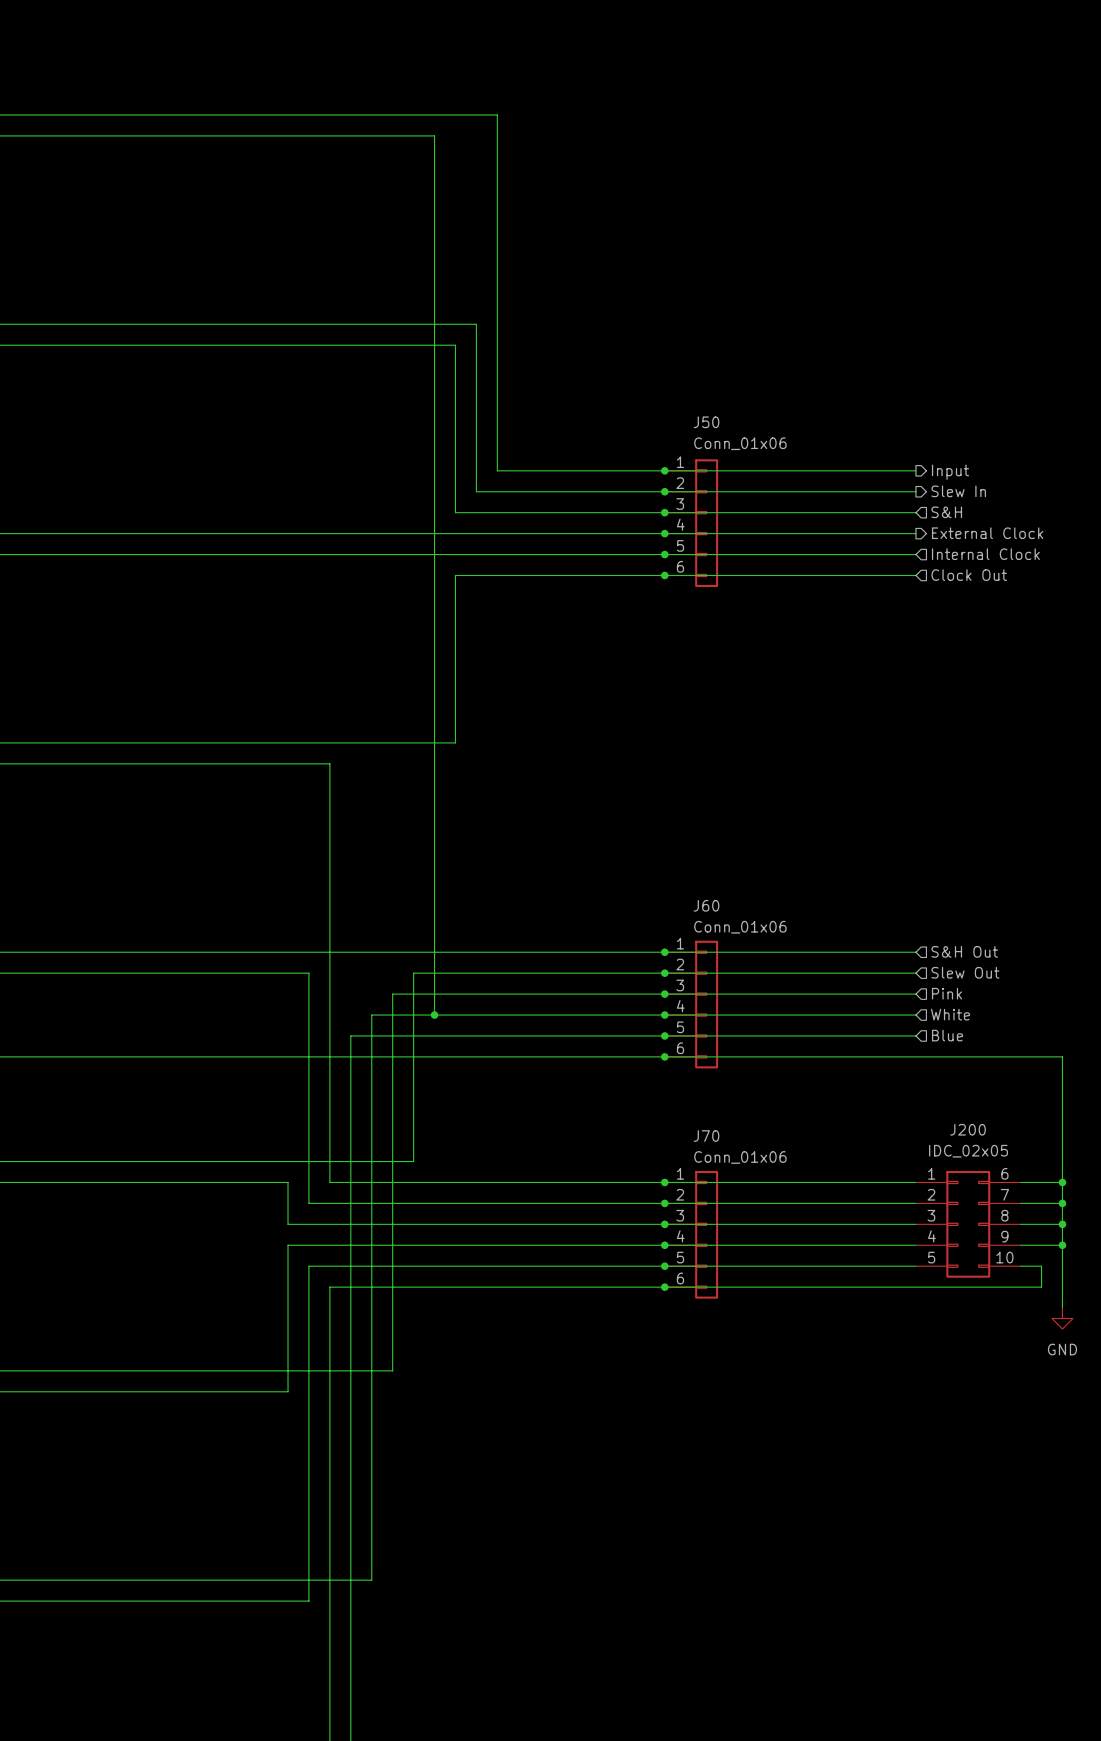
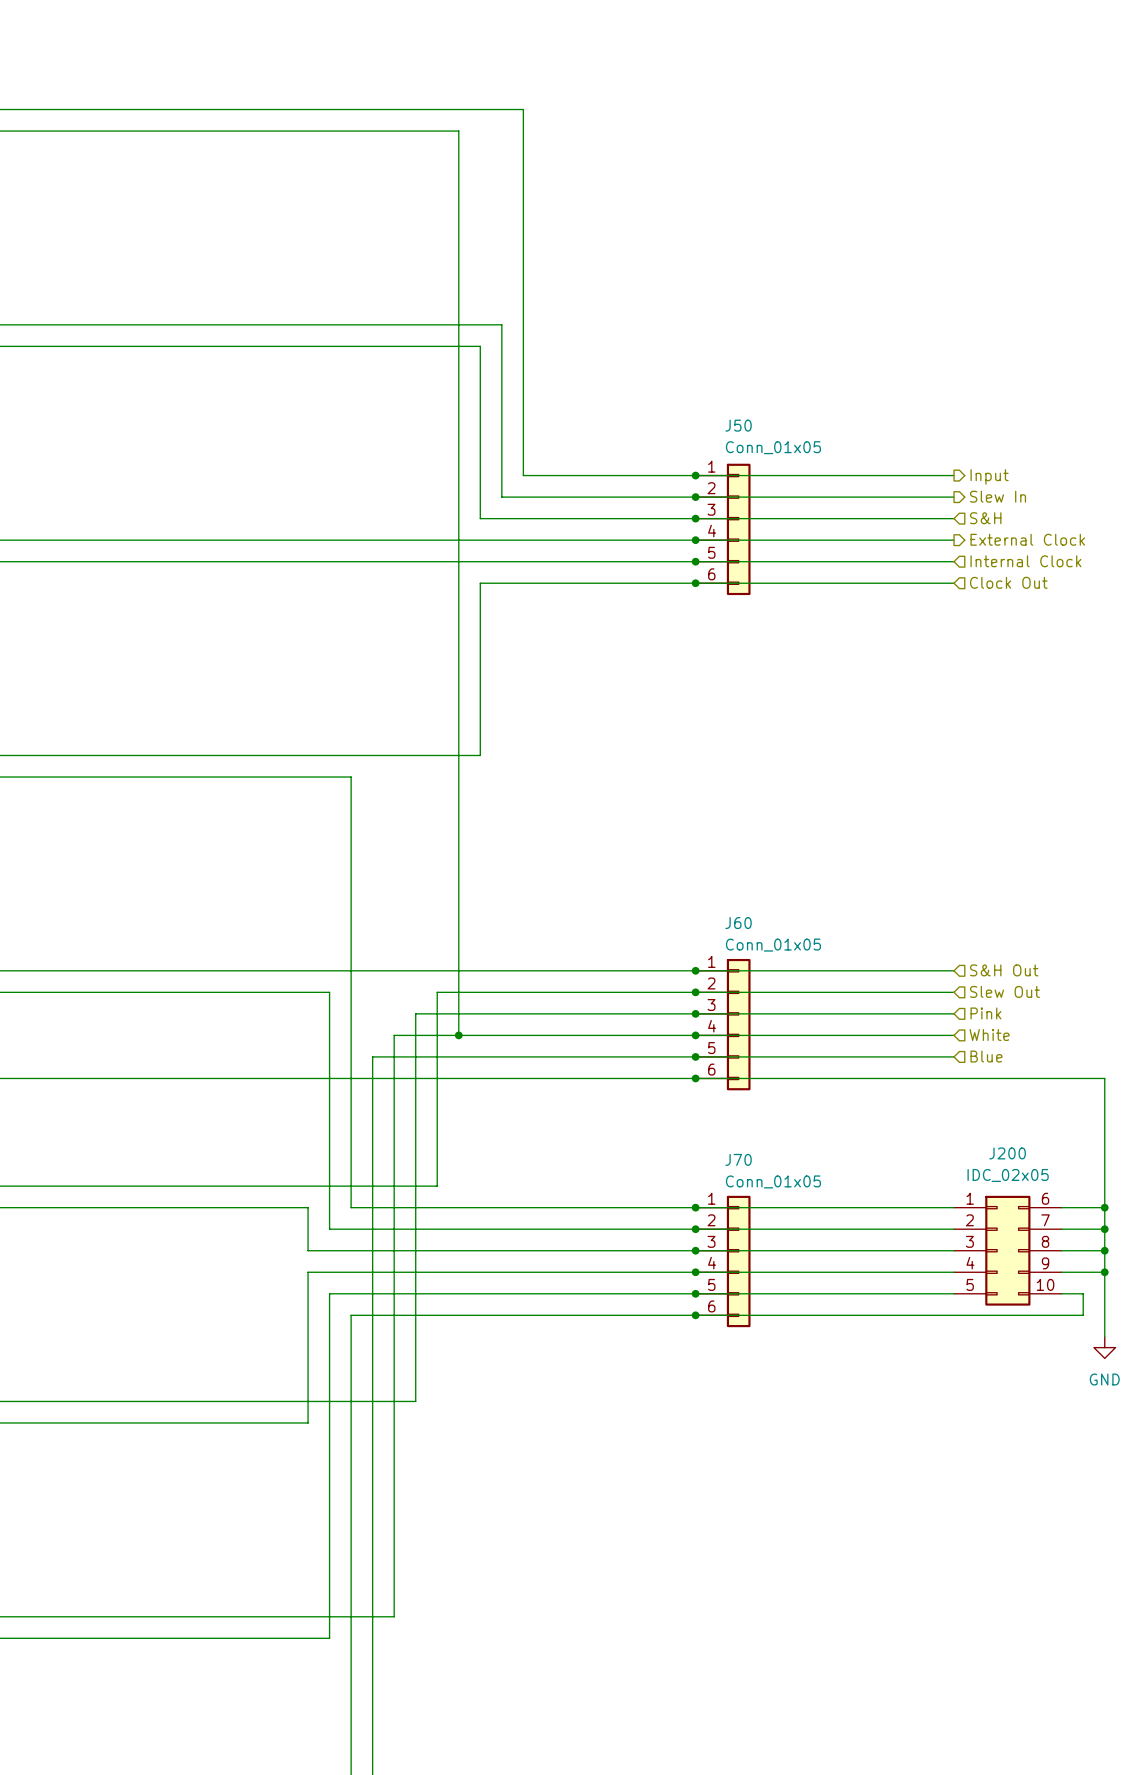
J50 value: Conn_01x06 (740, 443) -> Conn_01x05 (773, 447)
J60 value: Conn_01x06 (740, 927) -> Conn_01x05 (773, 945)
J70 value: Conn_01x06 (740, 1157) -> Conn_01x05 (773, 1181)

